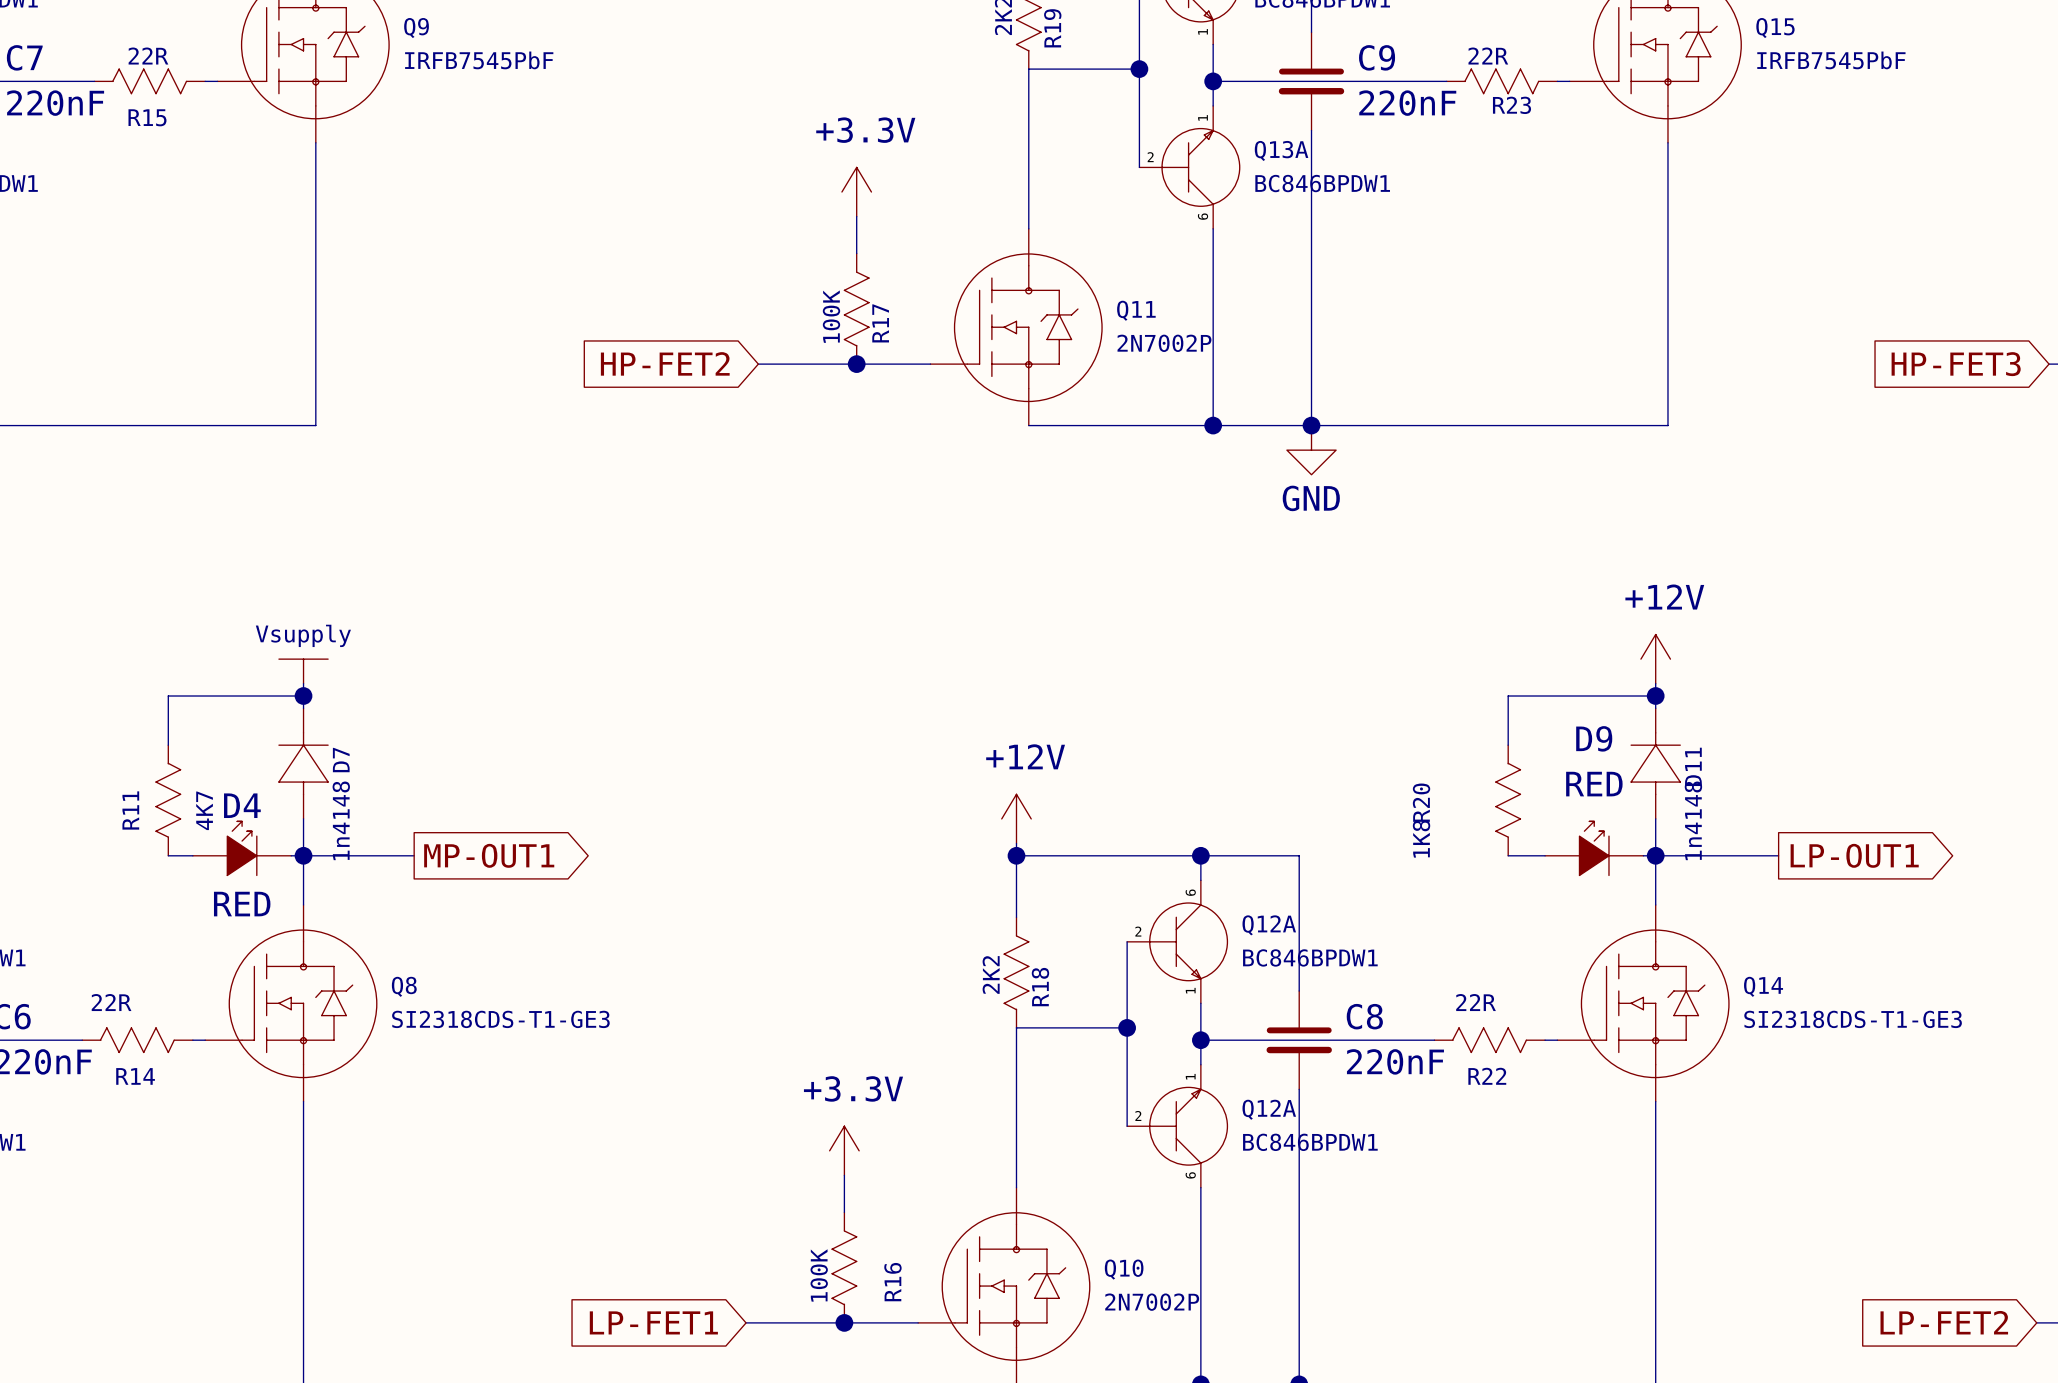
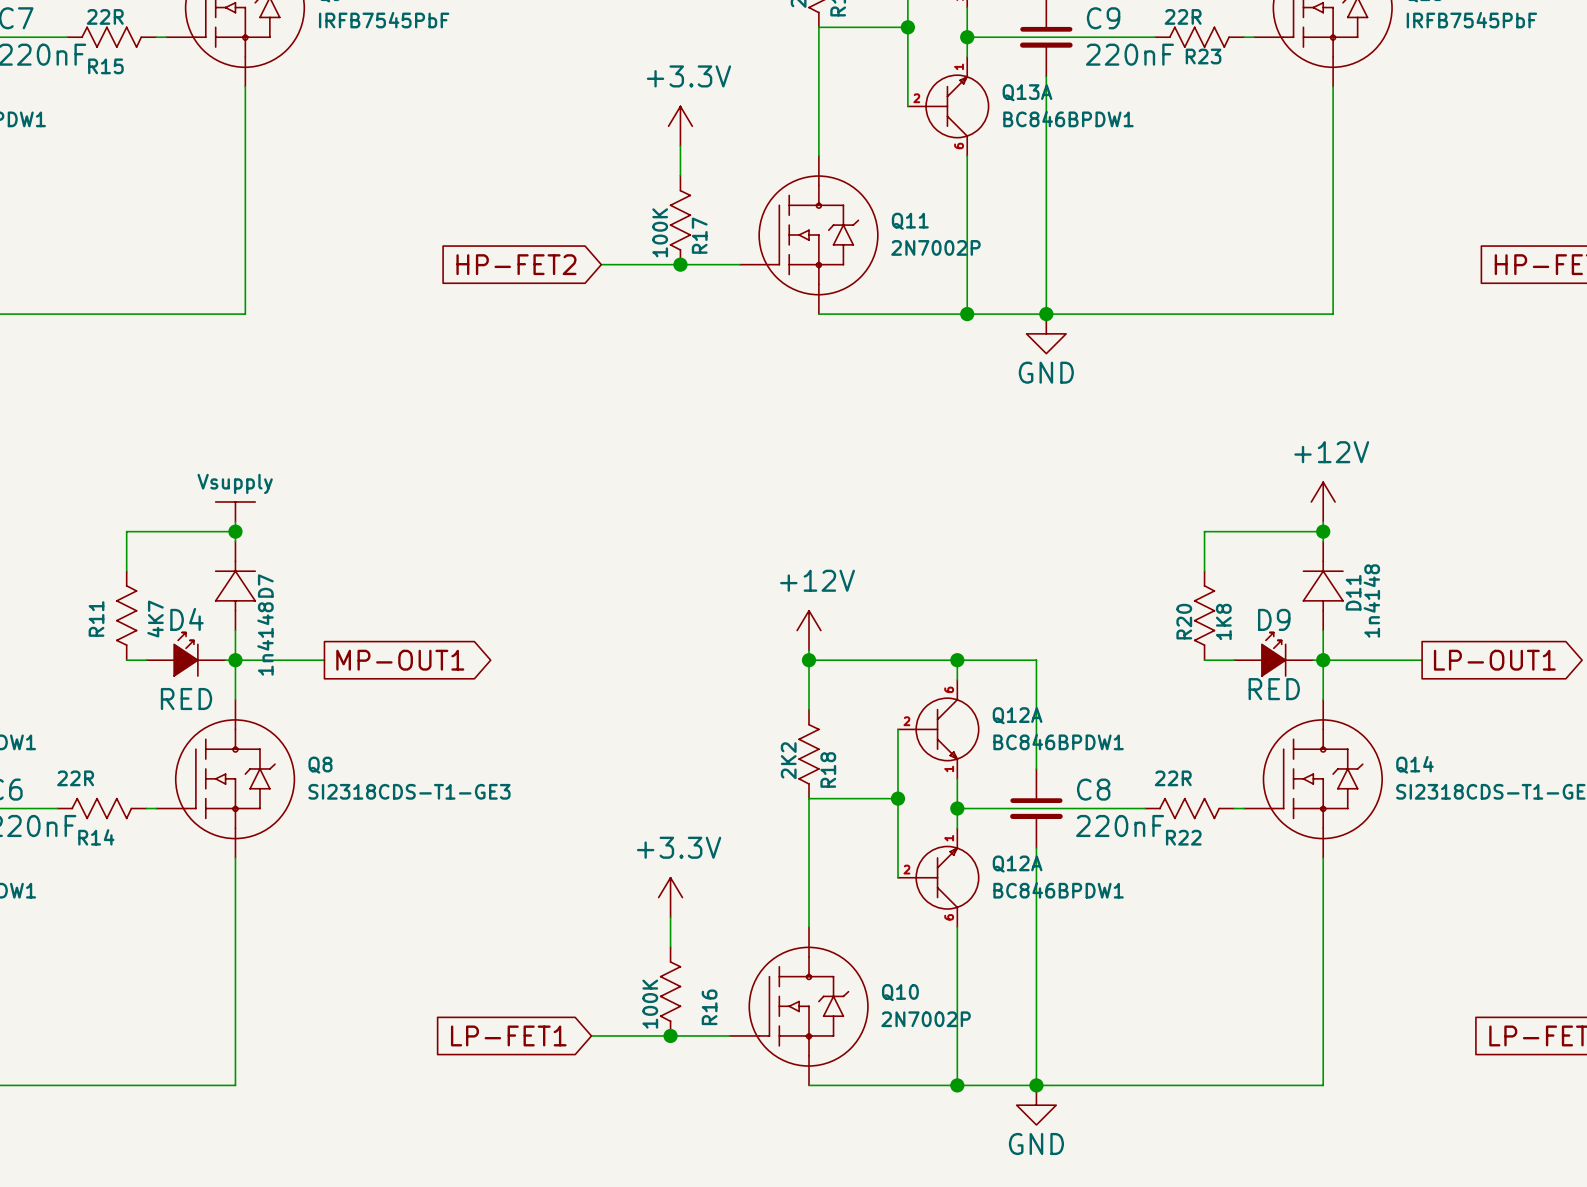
D9 name position: D9 (1594, 738) -> D9 (1274, 619)
D9 value position: RED (1594, 784) -> RED (1274, 689)
R20 name position: R20 (1421, 802) -> R20 (1184, 621)
D11 value position: 1n4148 (1693, 820) -> 1n4148 (1371, 600)
R20 value position: 1K8 (1421, 838) -> 1K8 (1223, 621)

